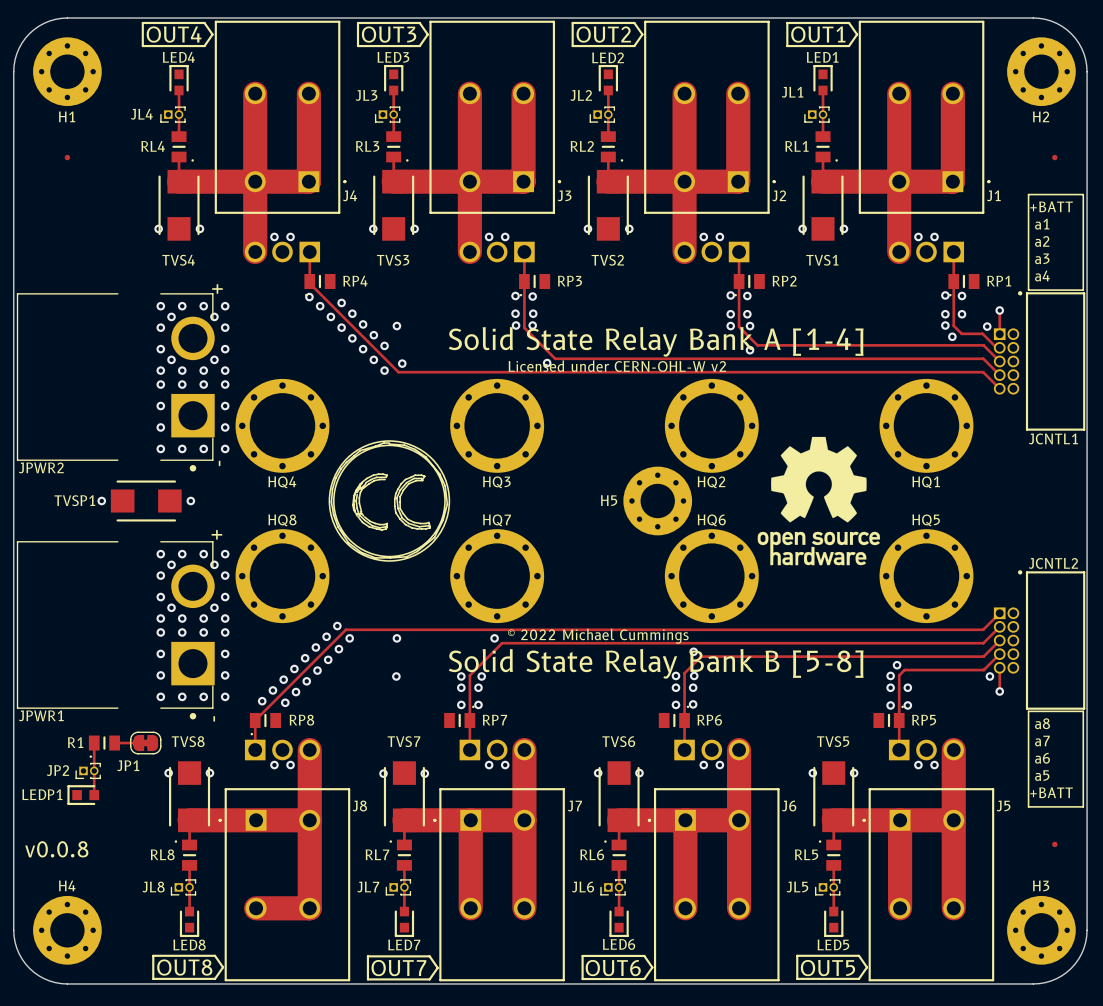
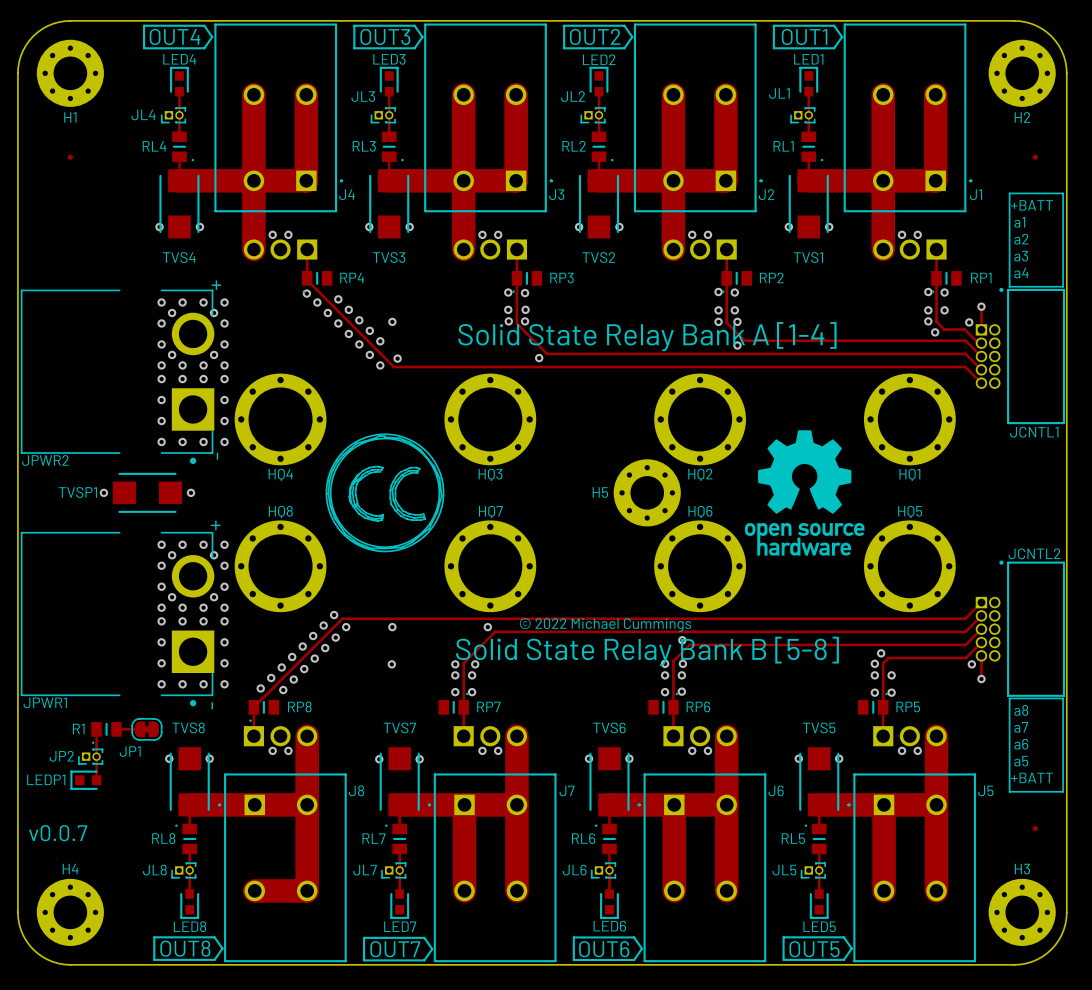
text: Licensed under CERN-OHL-W v2 (617, 366) -> none
text position: © 2022 Michael Cummings (598, 636) -> © 2022 Michael Cummings (605, 624)
text: v0.0.8 (56, 849) -> v0.0.7 (58, 833)

